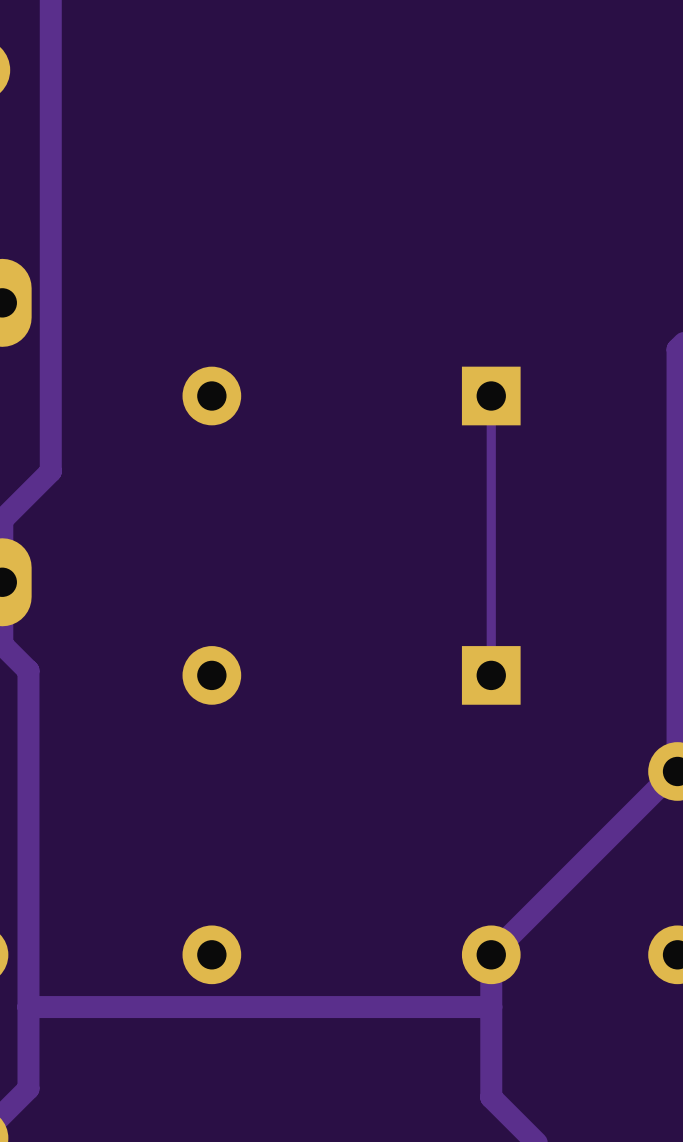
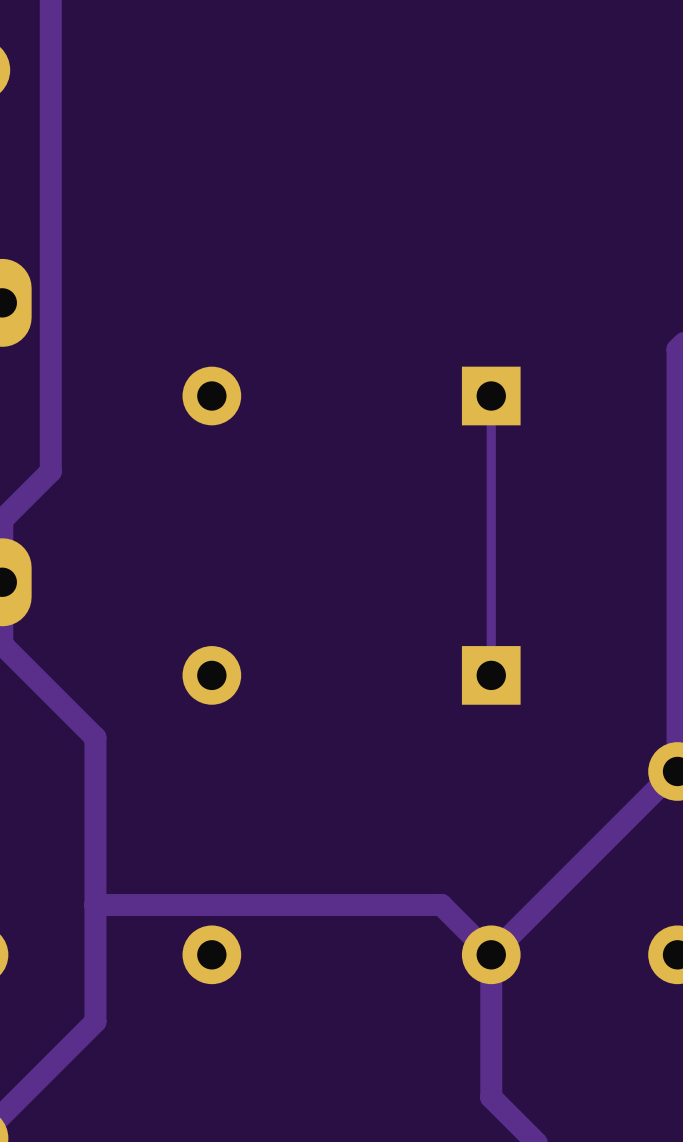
track: (28, 670) (28, 1088) -> (28, 670) (95, 737) (95, 1021) (28, 1088)
track: none -> (95, 905) (441, 905) (491, 954)
track: (491, 1007) (28, 1007) -> none

